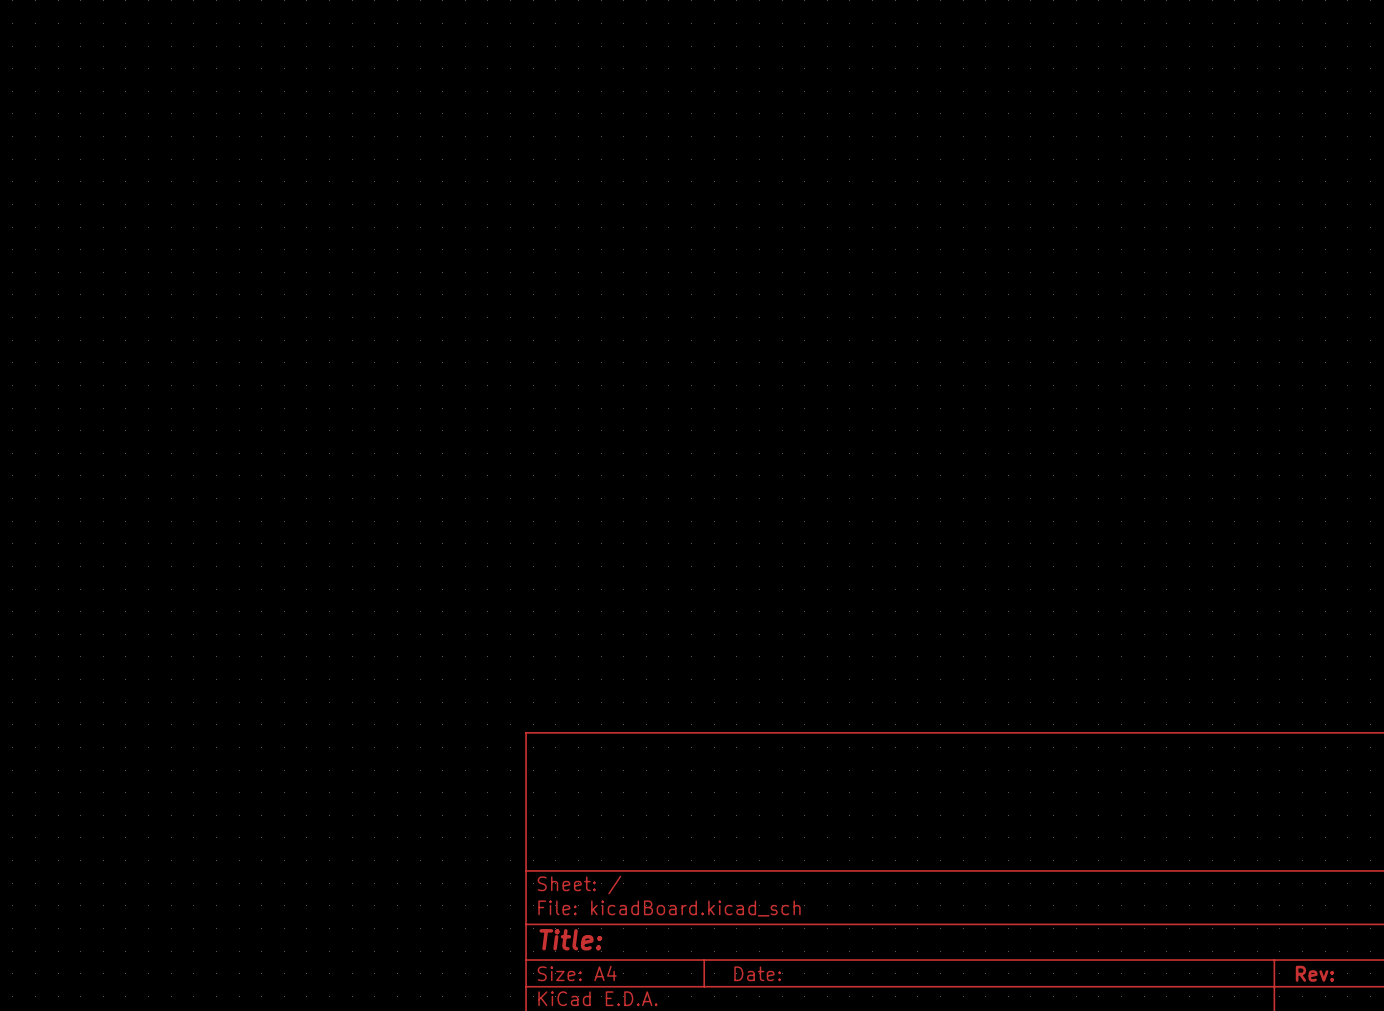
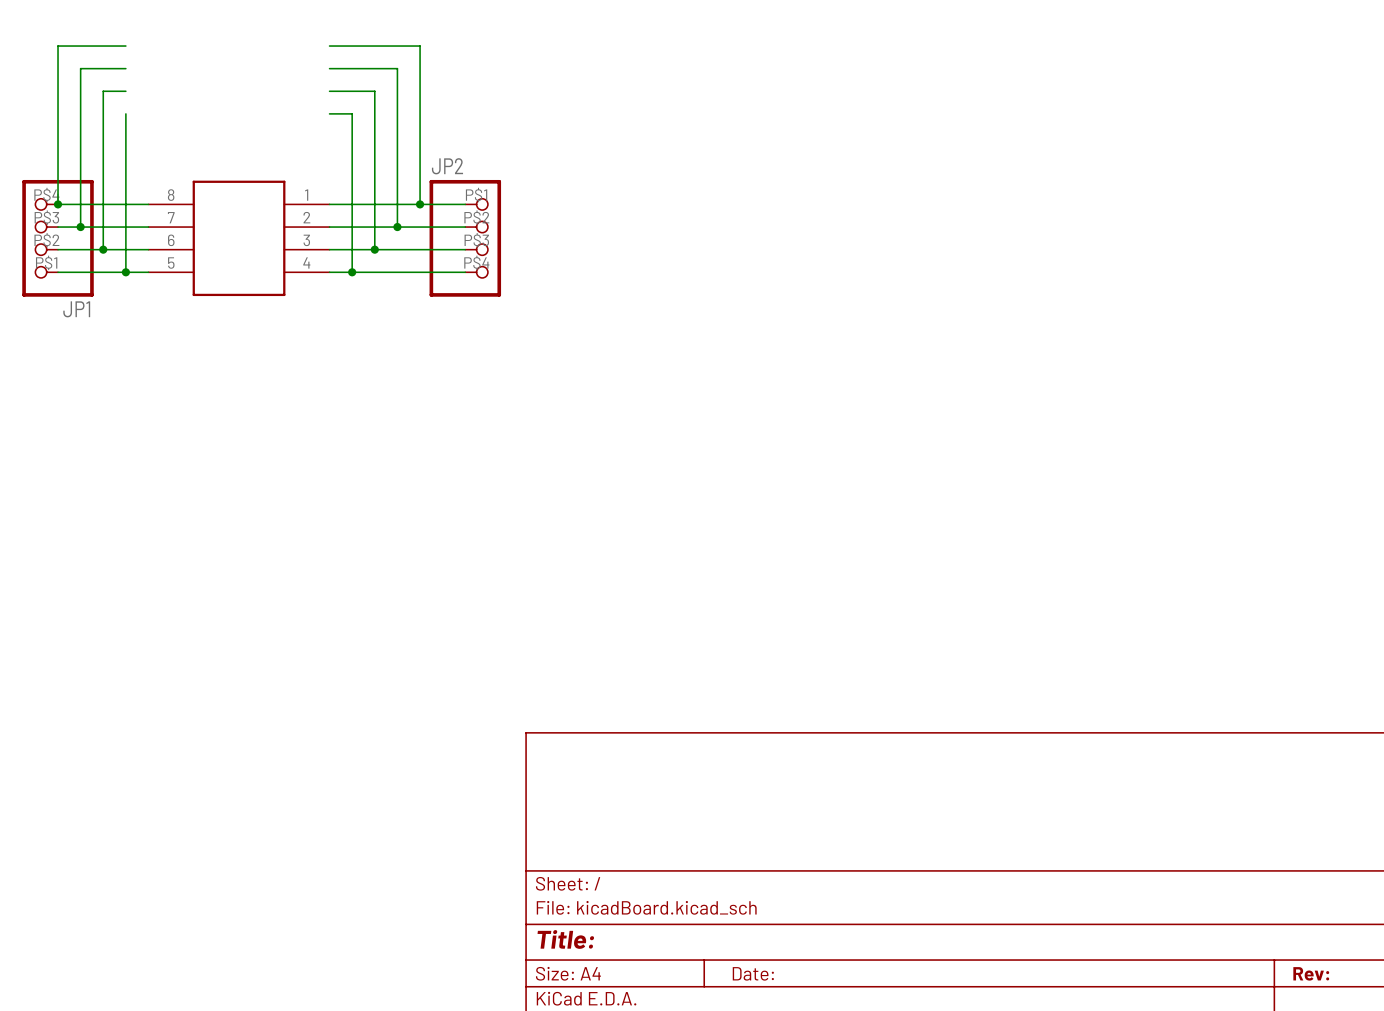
wire: none -> (125, 46) (58, 46) (58, 204) (148, 204)
wire: none -> (329, 46) (420, 46) (420, 204)
wire: none -> (125, 68) (80, 68) (80, 227)
wire: none -> (329, 68) (397, 68) (397, 227)
wire: none -> (125, 91) (103, 91) (103, 249)
wire: none -> (329, 91) (374, 91) (374, 249)
wire: none -> (125, 113) (125, 272)
wire: none -> (329, 113) (352, 113) (352, 272)
junction: none -> (58, 204)
wire: none -> (329, 204) (465, 204)
junction: none -> (420, 204)
wire: none -> (58, 227) (148, 227)
junction: none -> (80, 227)
wire: none -> (329, 227) (465, 227)
junction: none -> (397, 227)
JP1: none -> (58, 238)
part: none -> (239, 238)
JP2: none -> (465, 238)
wire: none -> (58, 249) (148, 249)
junction: none -> (103, 249)
wire: none -> (329, 249) (465, 249)
junction: none -> (374, 249)
wire: none -> (58, 272) (148, 272)
junction: none -> (125, 272)
wire: none -> (329, 272) (465, 272)
junction: none -> (352, 272)

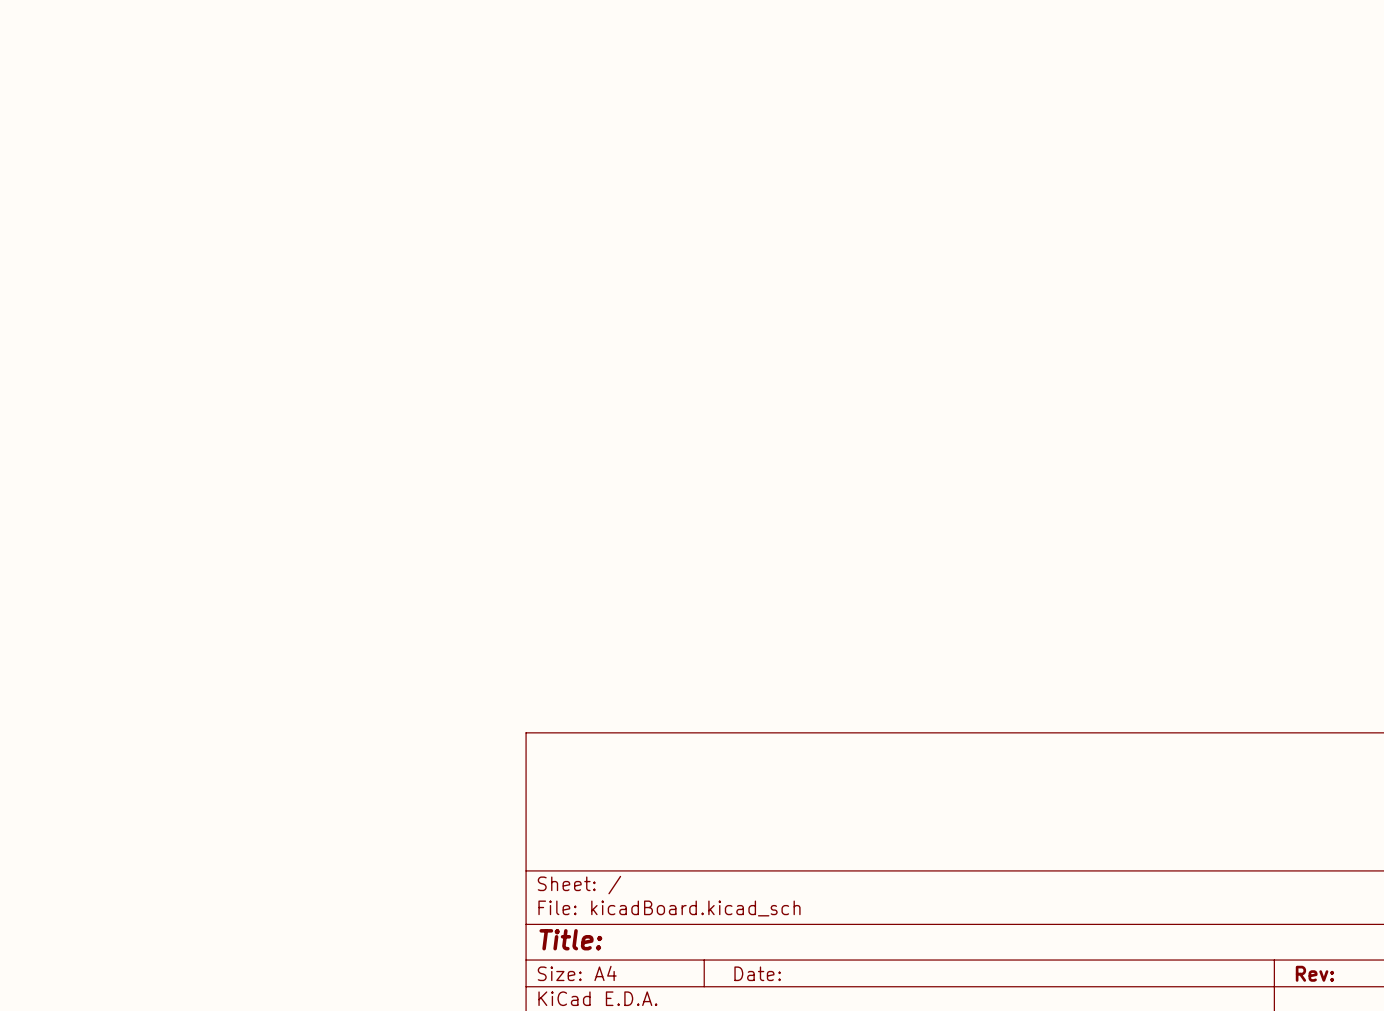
wire: (125, 46) (58, 46) (58, 204) (148, 204) -> none
wire: (329, 46) (420, 46) (420, 204) -> none
wire: (125, 68) (80, 68) (80, 227) -> none
wire: (329, 68) (397, 68) (397, 227) -> none
wire: (125, 91) (103, 91) (103, 249) -> none
wire: (329, 91) (374, 91) (374, 249) -> none
wire: (125, 113) (125, 272) -> none
wire: (329, 113) (352, 113) (352, 272) -> none
junction: (58, 204) -> none
wire: (329, 204) (465, 204) -> none
junction: (420, 204) -> none
wire: (58, 227) (148, 227) -> none
junction: (80, 227) -> none
wire: (329, 227) (465, 227) -> none
junction: (397, 227) -> none
JP1: (58, 238) -> none
part: (239, 238) -> none
JP2: (465, 238) -> none
wire: (58, 249) (148, 249) -> none
junction: (103, 249) -> none
wire: (329, 249) (465, 249) -> none
junction: (374, 249) -> none
wire: (58, 272) (148, 272) -> none
junction: (125, 272) -> none
wire: (329, 272) (465, 272) -> none
junction: (352, 272) -> none

